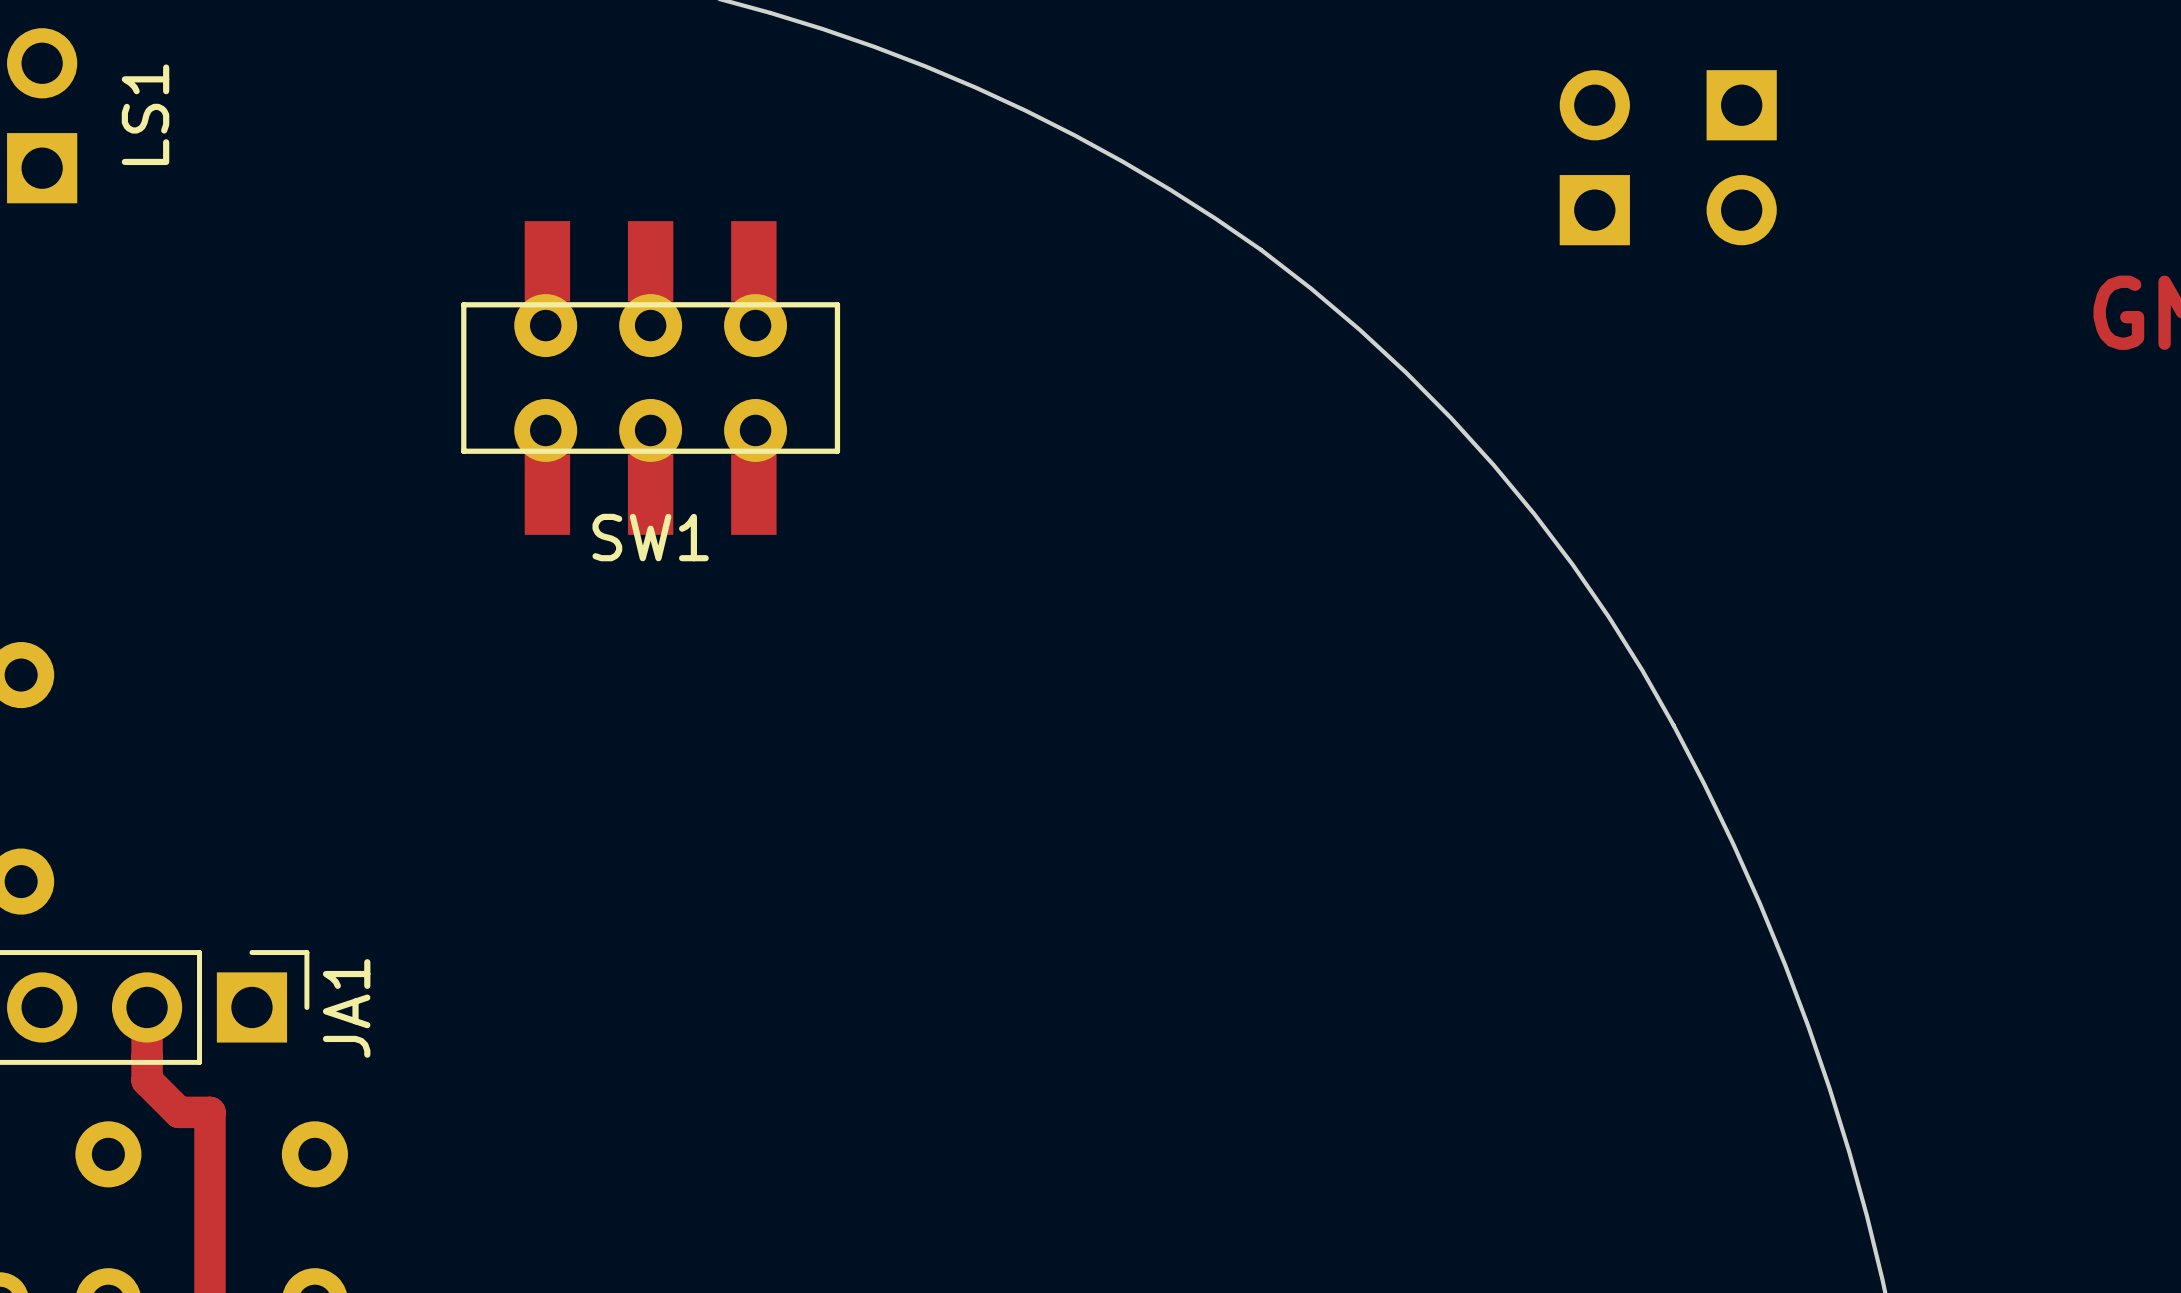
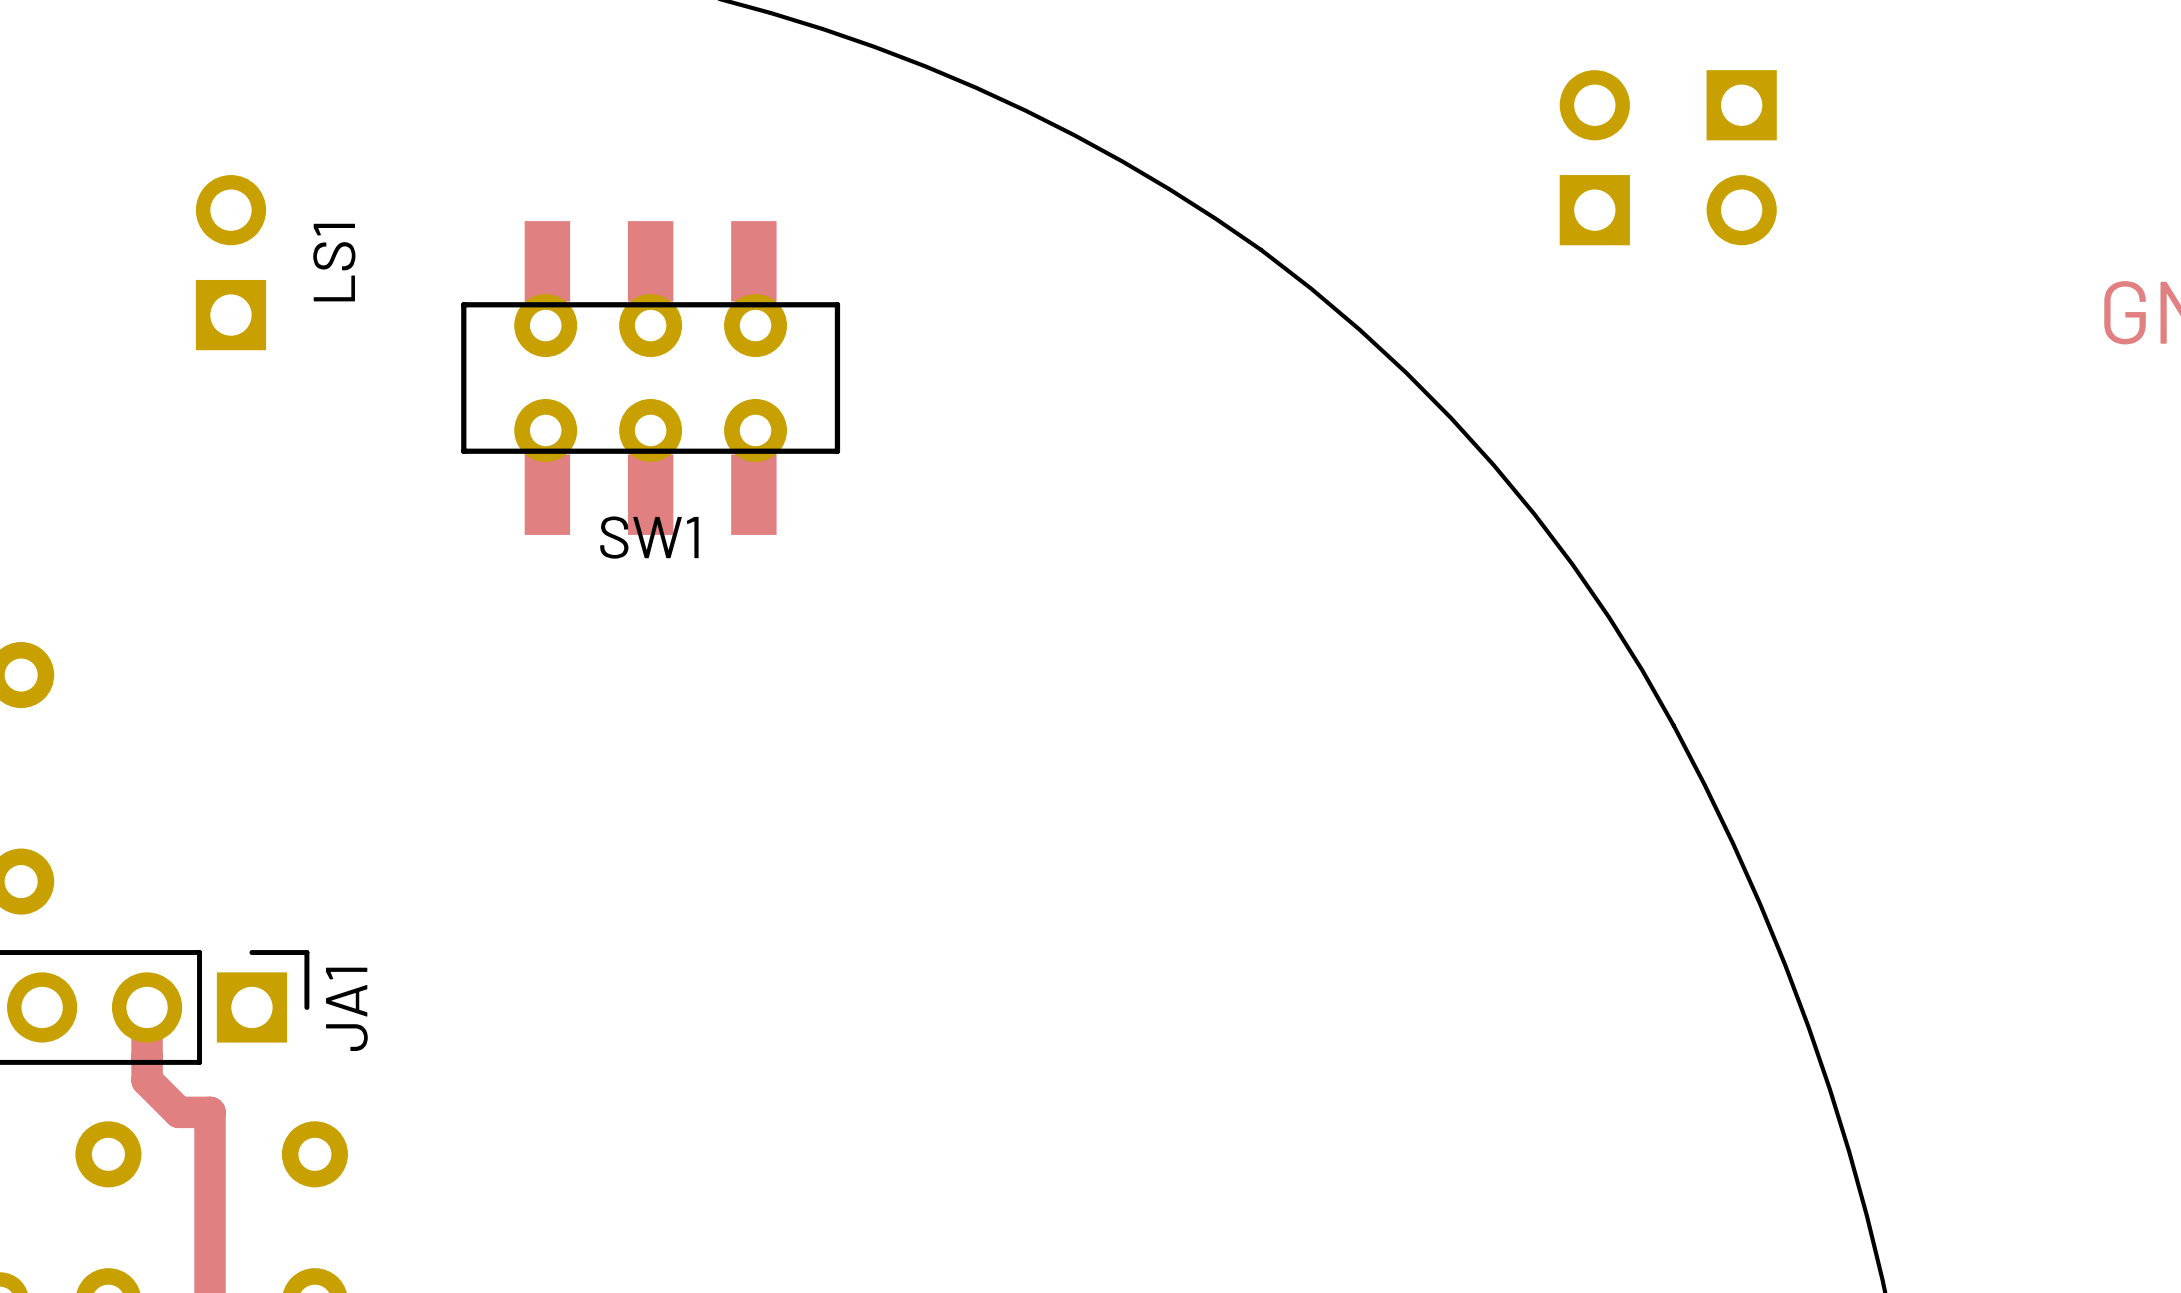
LS1 position: (42, 115) -> (230, 262)

